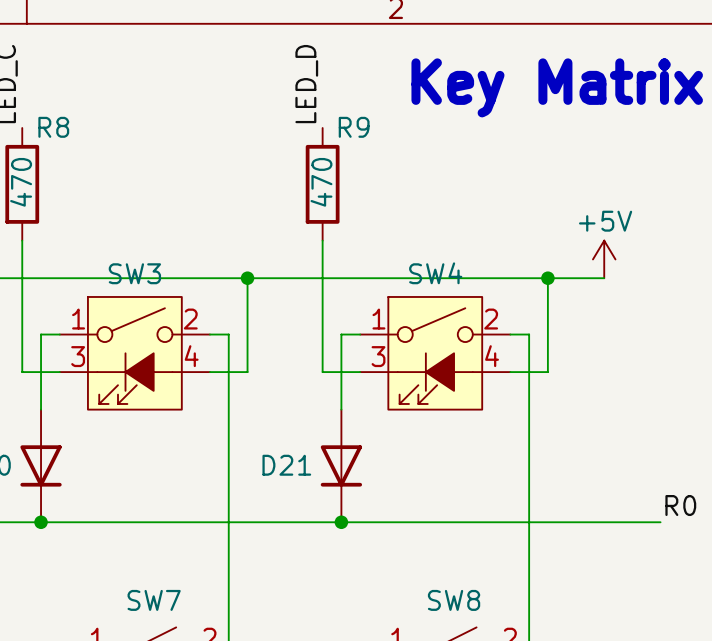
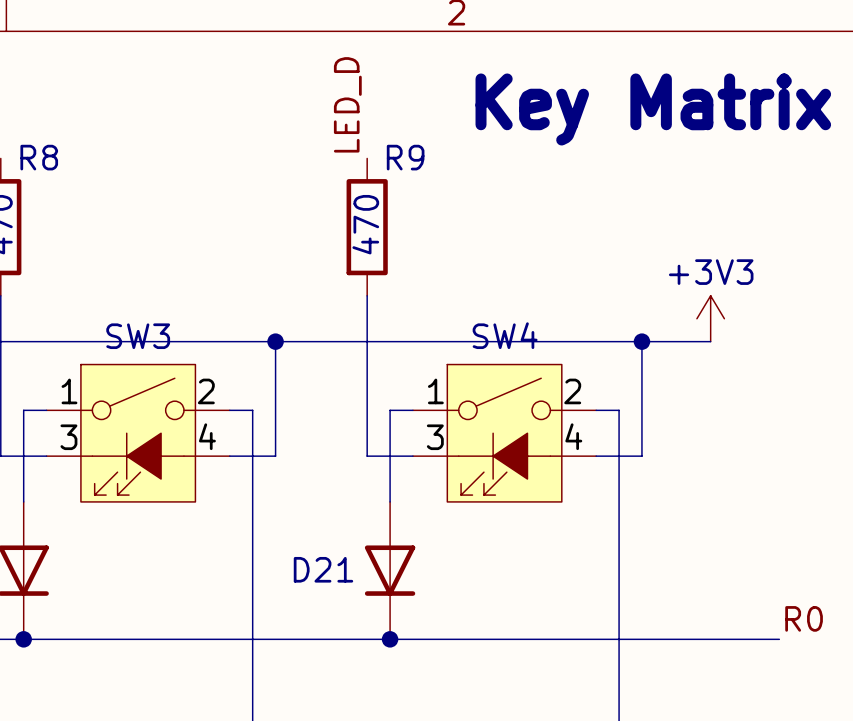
power symbol: +5V (604, 259) -> +3V3 (710, 318)

